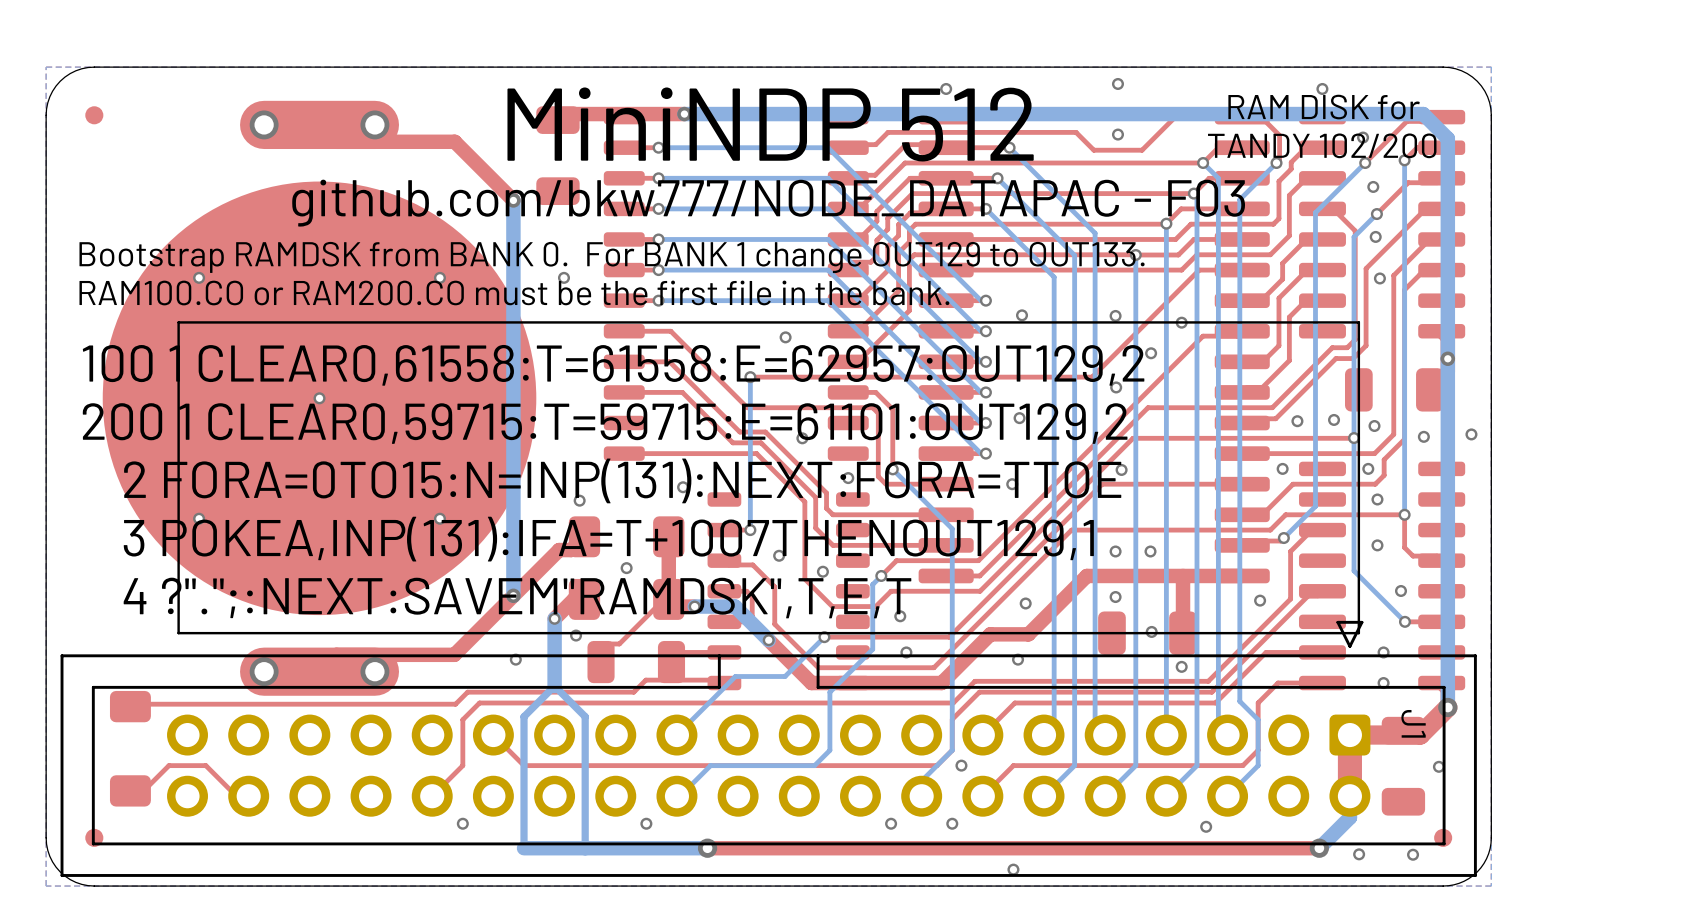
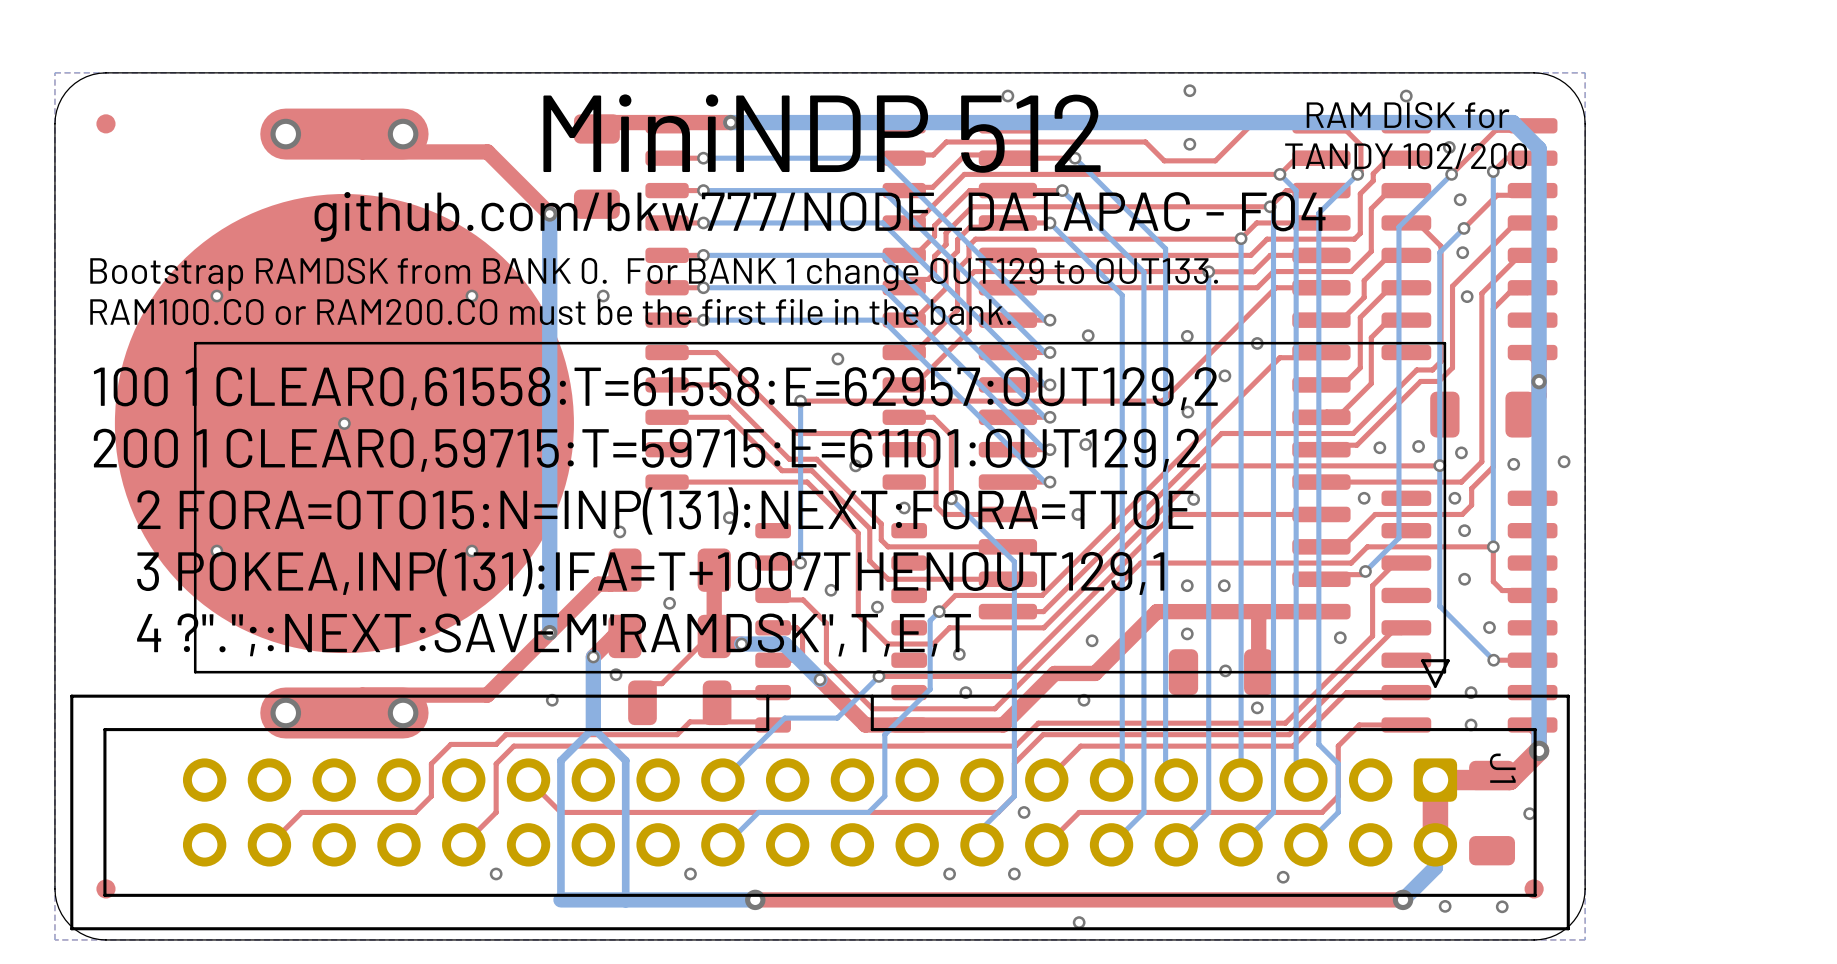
text: github.com/bkw777/NODE_DATAPAC - F03 (768, 203) -> github.com/bkw777/NODE_DATAPAC - F04 (820, 216)
top track: (472, 692) (467, 692) (455, 704) (132, 704) (130, 706) -> (505, 734) (496, 744) (450, 744) (431, 763) (431, 796) (415, 812) (301, 812) (269, 844)
part: (130, 748) -> none
top track: (130, 790) (143, 790) (168, 765) (205, 765) (236, 796) (248, 796) -> none

